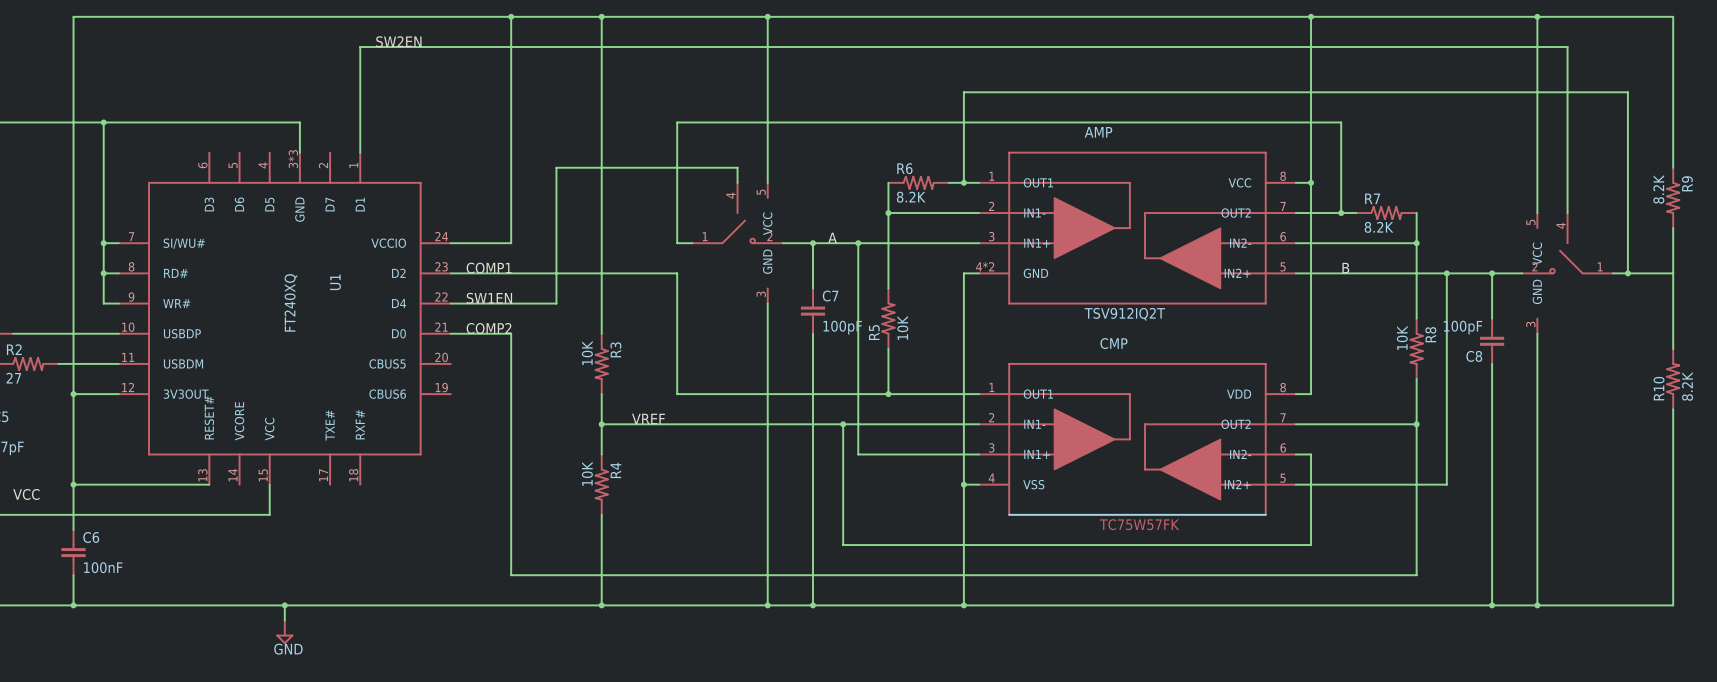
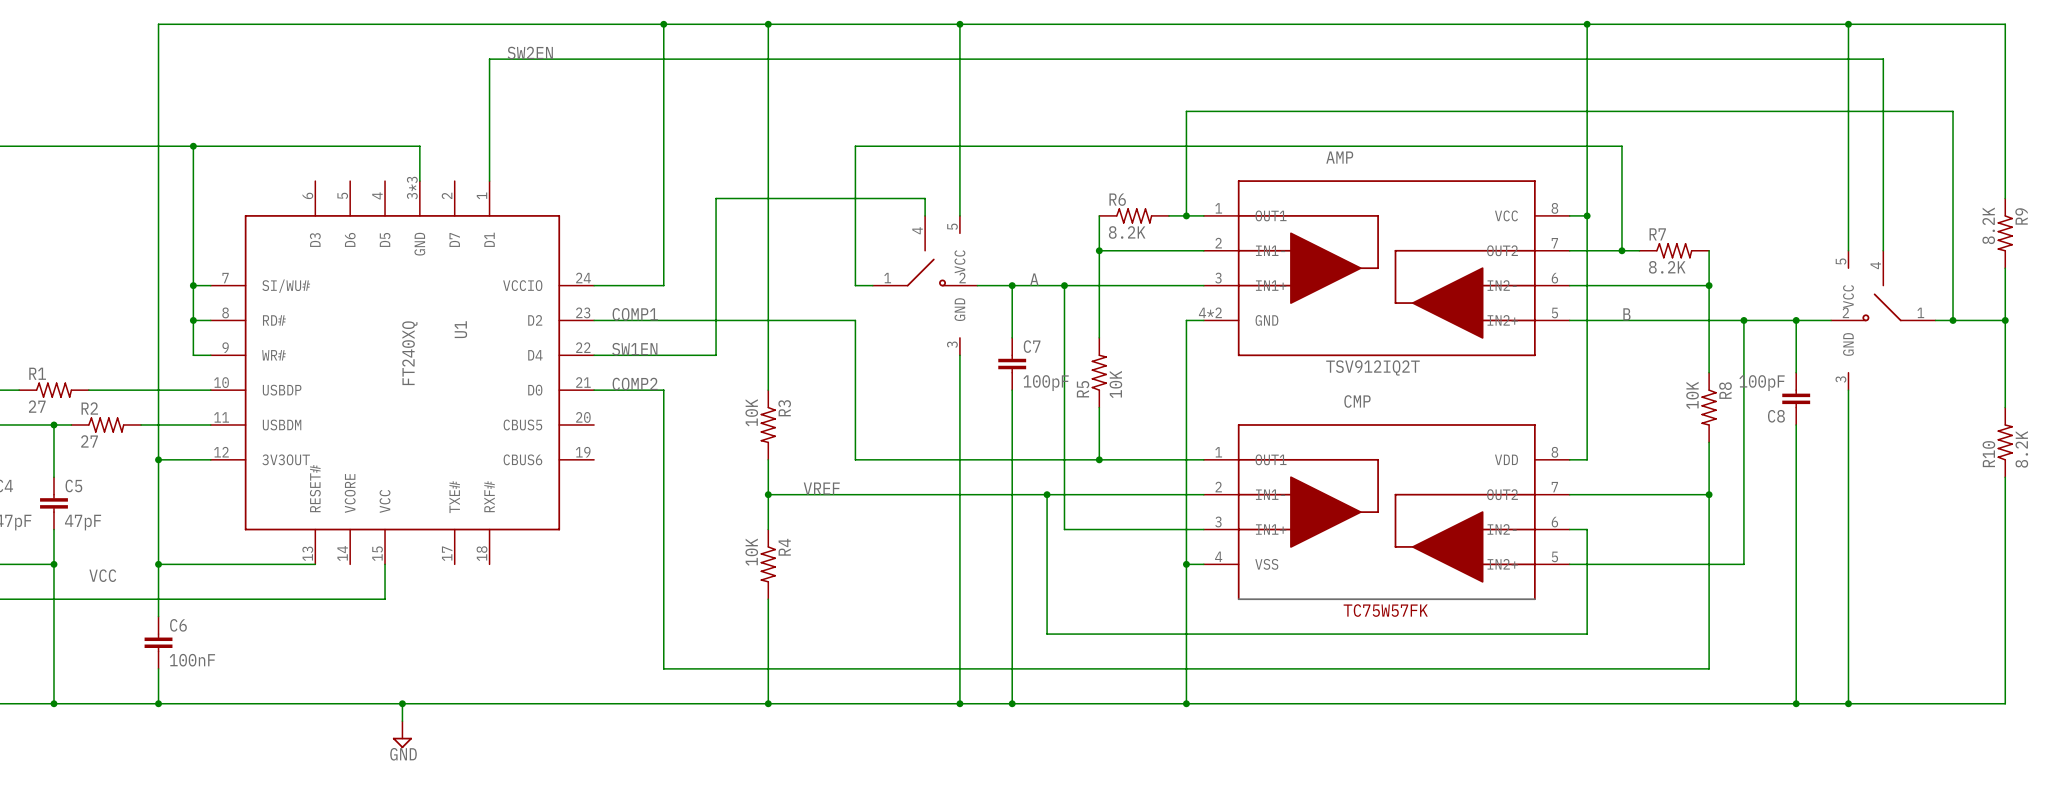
junction: none -> (2005, 320)

